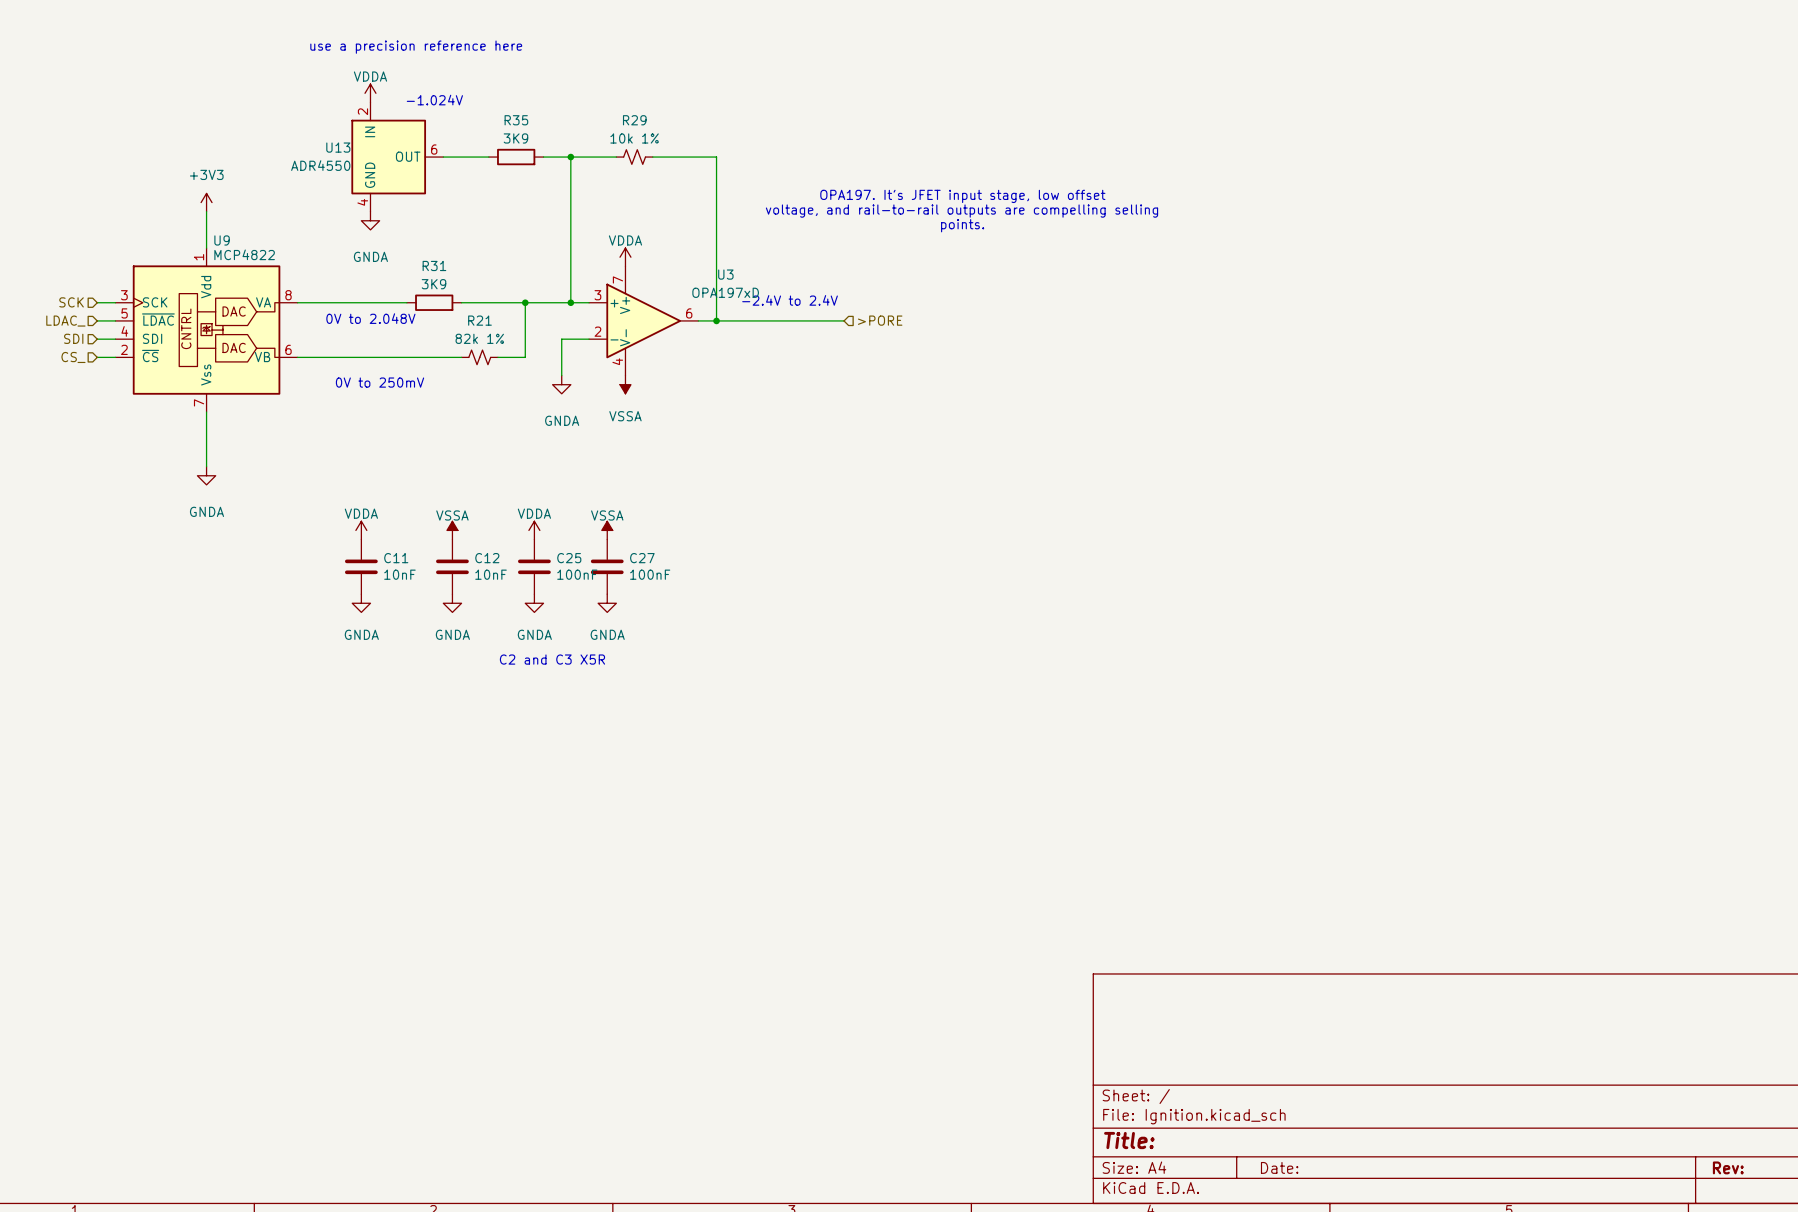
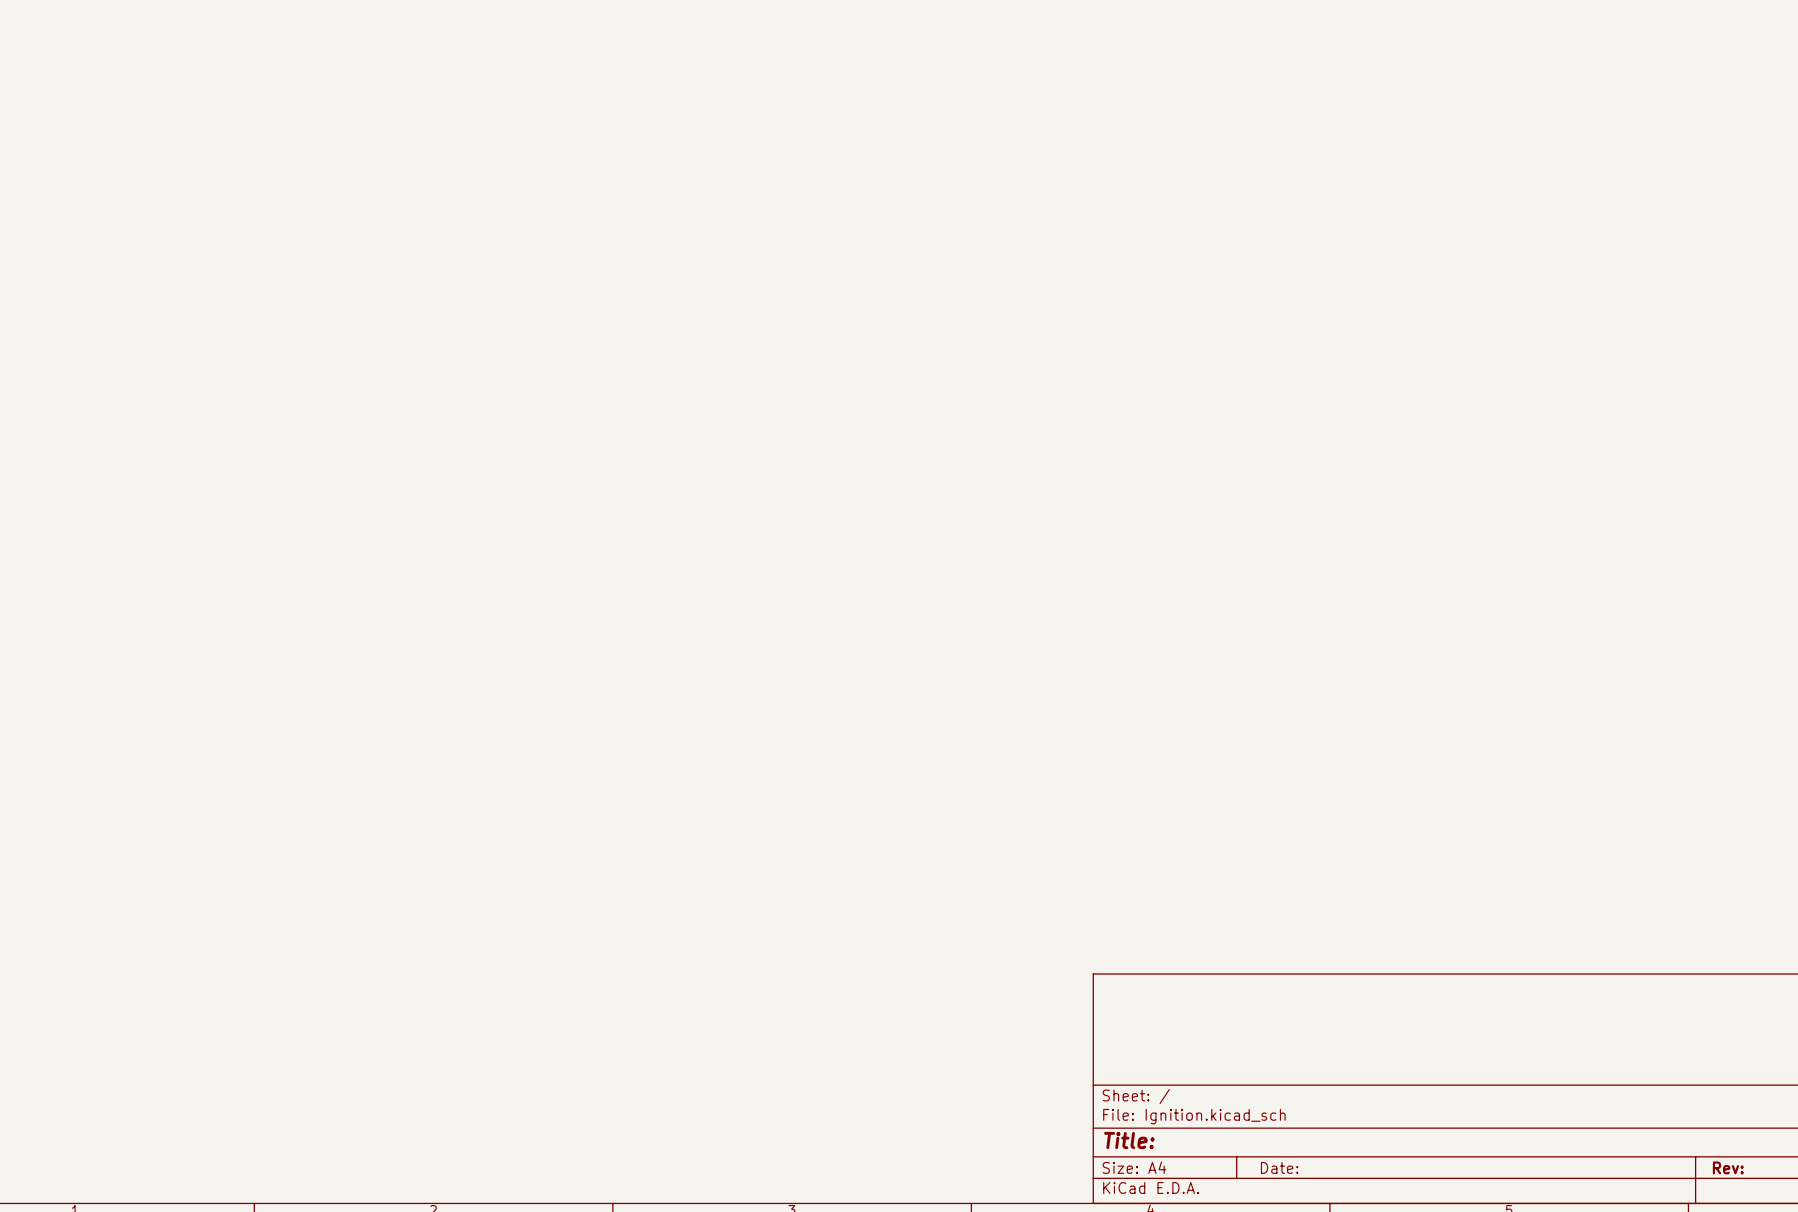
text: use a precision reference here (416, 47) -> none
power symbol: VDDA (370, 93) -> none
text: -1.024V (434, 100) -> none
U13: ADR4550 (397, 157) -> none
wire: (443, 157) (488, 157) -> none
R35: 3K9 (516, 157) -> none
wire: (543, 157) (616, 157) -> none
wire: (570, 157) (570, 302) -> none
junction: (570, 157) -> none
R29: 10k 1% (634, 157) -> none
wire: (652, 157) (716, 157) (716, 320) -> none
text: OPA197. It's JFET input stage, low offset (962, 196) -> none
power symbol: +3V3 (206, 202) -> none
wire: (206, 211) (206, 248) -> none
text: voltage, and rail-to-rail outputs are compelling selling (961, 211) -> none
power symbol: GNDA (370, 220) -> none
text: points. (962, 225) -> none
power symbol: VDDA (625, 257) -> none
text: -2.4V to 2.4V (790, 300) -> none
hierarchical label: SCK (71, 302) -> none
wire: (97, 302) (115, 302) -> none
wire: (297, 302) (406, 302) -> none
R31: 3K9 (434, 302) -> none
wire: (461, 302) (589, 302) -> none
wire: (525, 302) (525, 357) (497, 357) -> none
junction: (525, 302) -> none
junction: (570, 302) -> none
text: 0V to 2.048V (370, 318) -> none
wire: (97, 320) (115, 320) -> none
U3: OPA197xD (643, 320) -> none
wire: (698, 320) (844, 320) -> none
junction: (716, 320) -> none
hierarchical label: >PORE (880, 320) -> none
hierarchical label: LDAC_ (65, 321) -> none
U9: MCP4822 (206, 330) -> none
hierarchical label: SDI (73, 338) -> none
wire: (97, 339) (115, 339) -> none
wire: (589, 339) (561, 339) (561, 375) -> none
hierarchical label: CS_ (73, 357) -> none
wire: (97, 357) (115, 357) -> none
wire: (297, 357) (461, 357) -> none
R21: 82k 1% (479, 357) -> none
text: 0V to 250mV (380, 382) -> none
power symbol: GNDA (561, 384) -> none
power symbol: VSSA (625, 384) -> none
wire: (206, 412) (206, 466) -> none
power symbol: GNDA (206, 475) -> none
power symbol: VDDA (361, 530) -> none
power symbol: VSSA (452, 530) -> none
power symbol: VDDA (534, 530) -> none
power symbol: VSSA (607, 530) -> none
C11: 10nF (361, 566) -> none
C12: 10nF (452, 566) -> none
C25: 100nF (534, 566) -> none
C27: 100nF (607, 566) -> none
power symbol: GNDA (361, 603) -> none
power symbol: GNDA (452, 603) -> none
power symbol: GNDA (534, 603) -> none
power symbol: GNDA (607, 603) -> none
text: C2 and C3 X5R (552, 659) -> none

